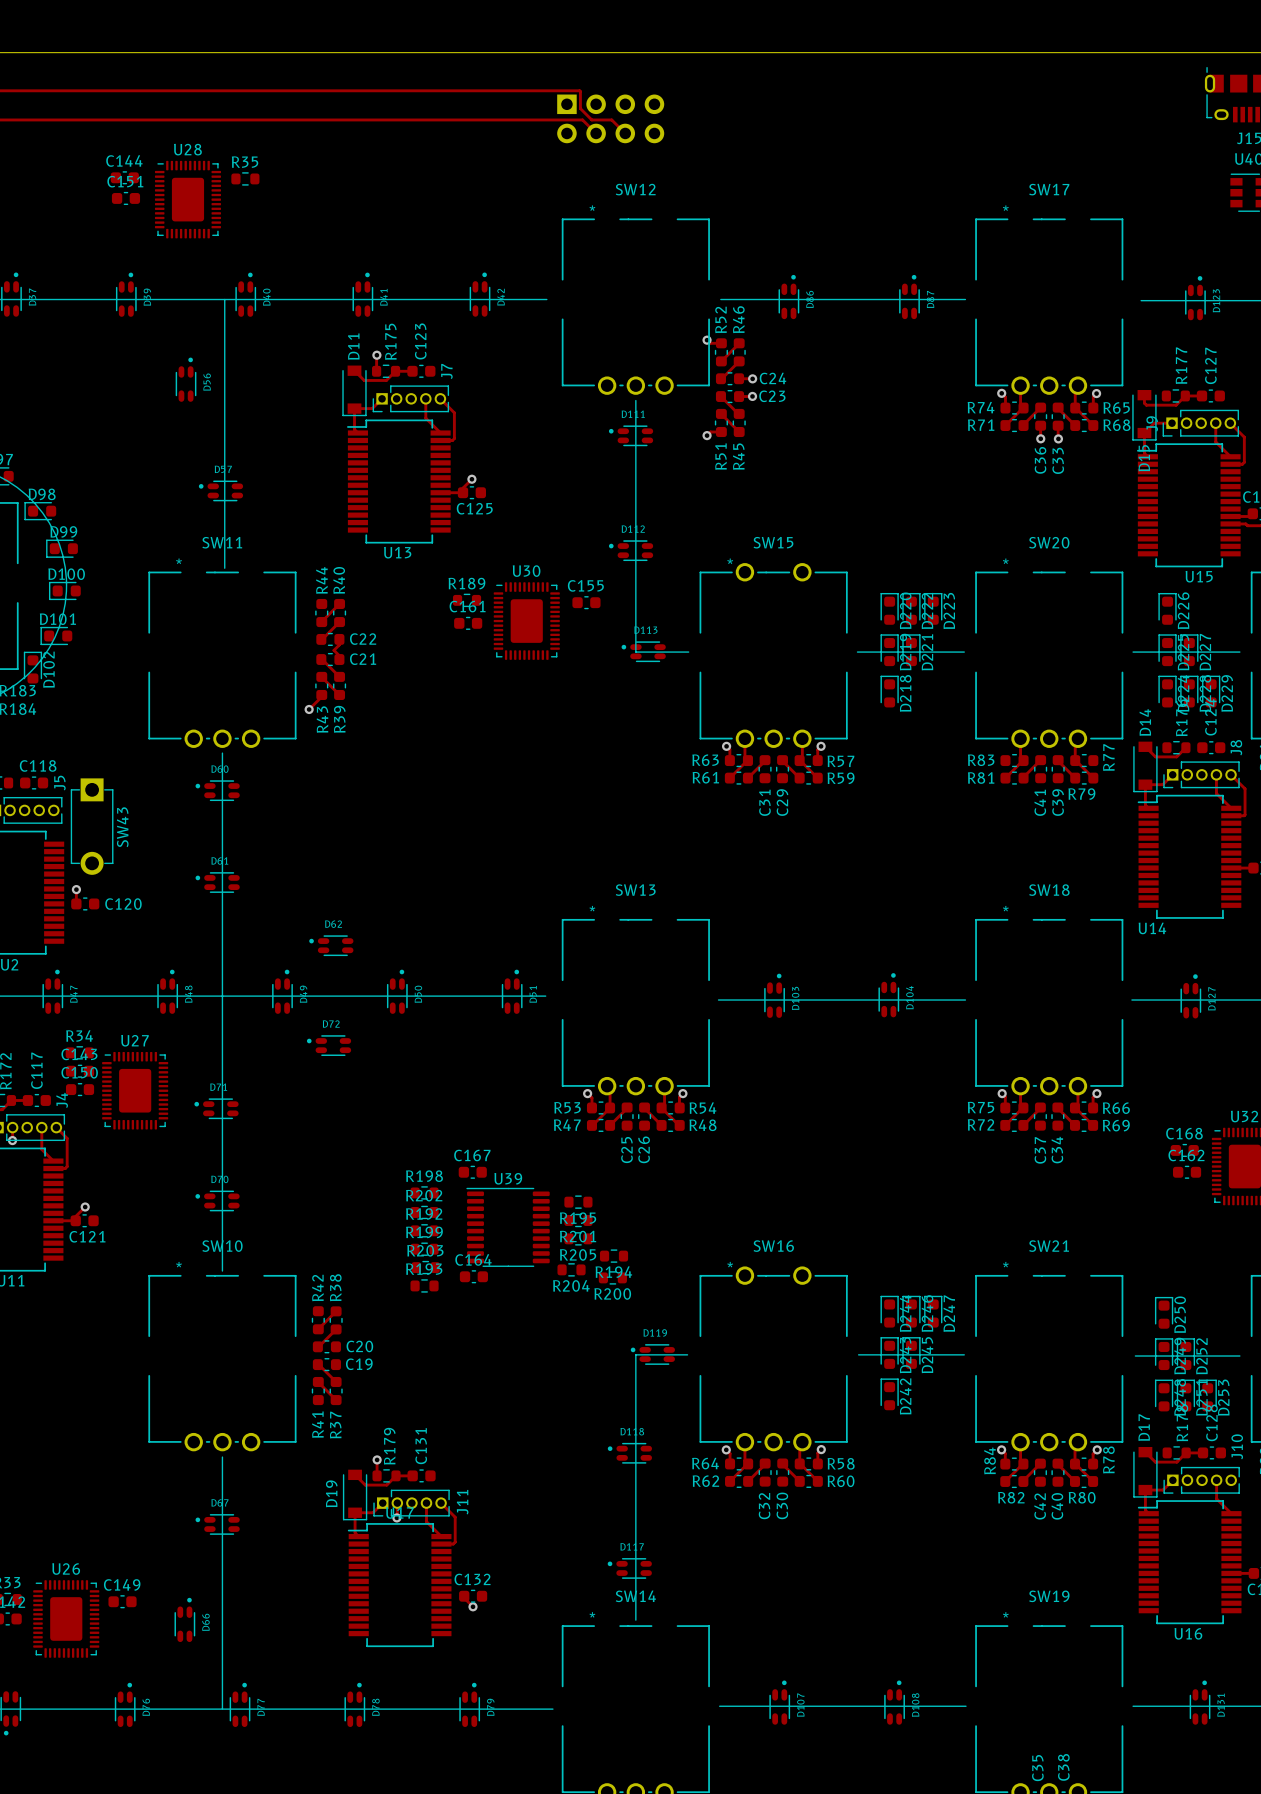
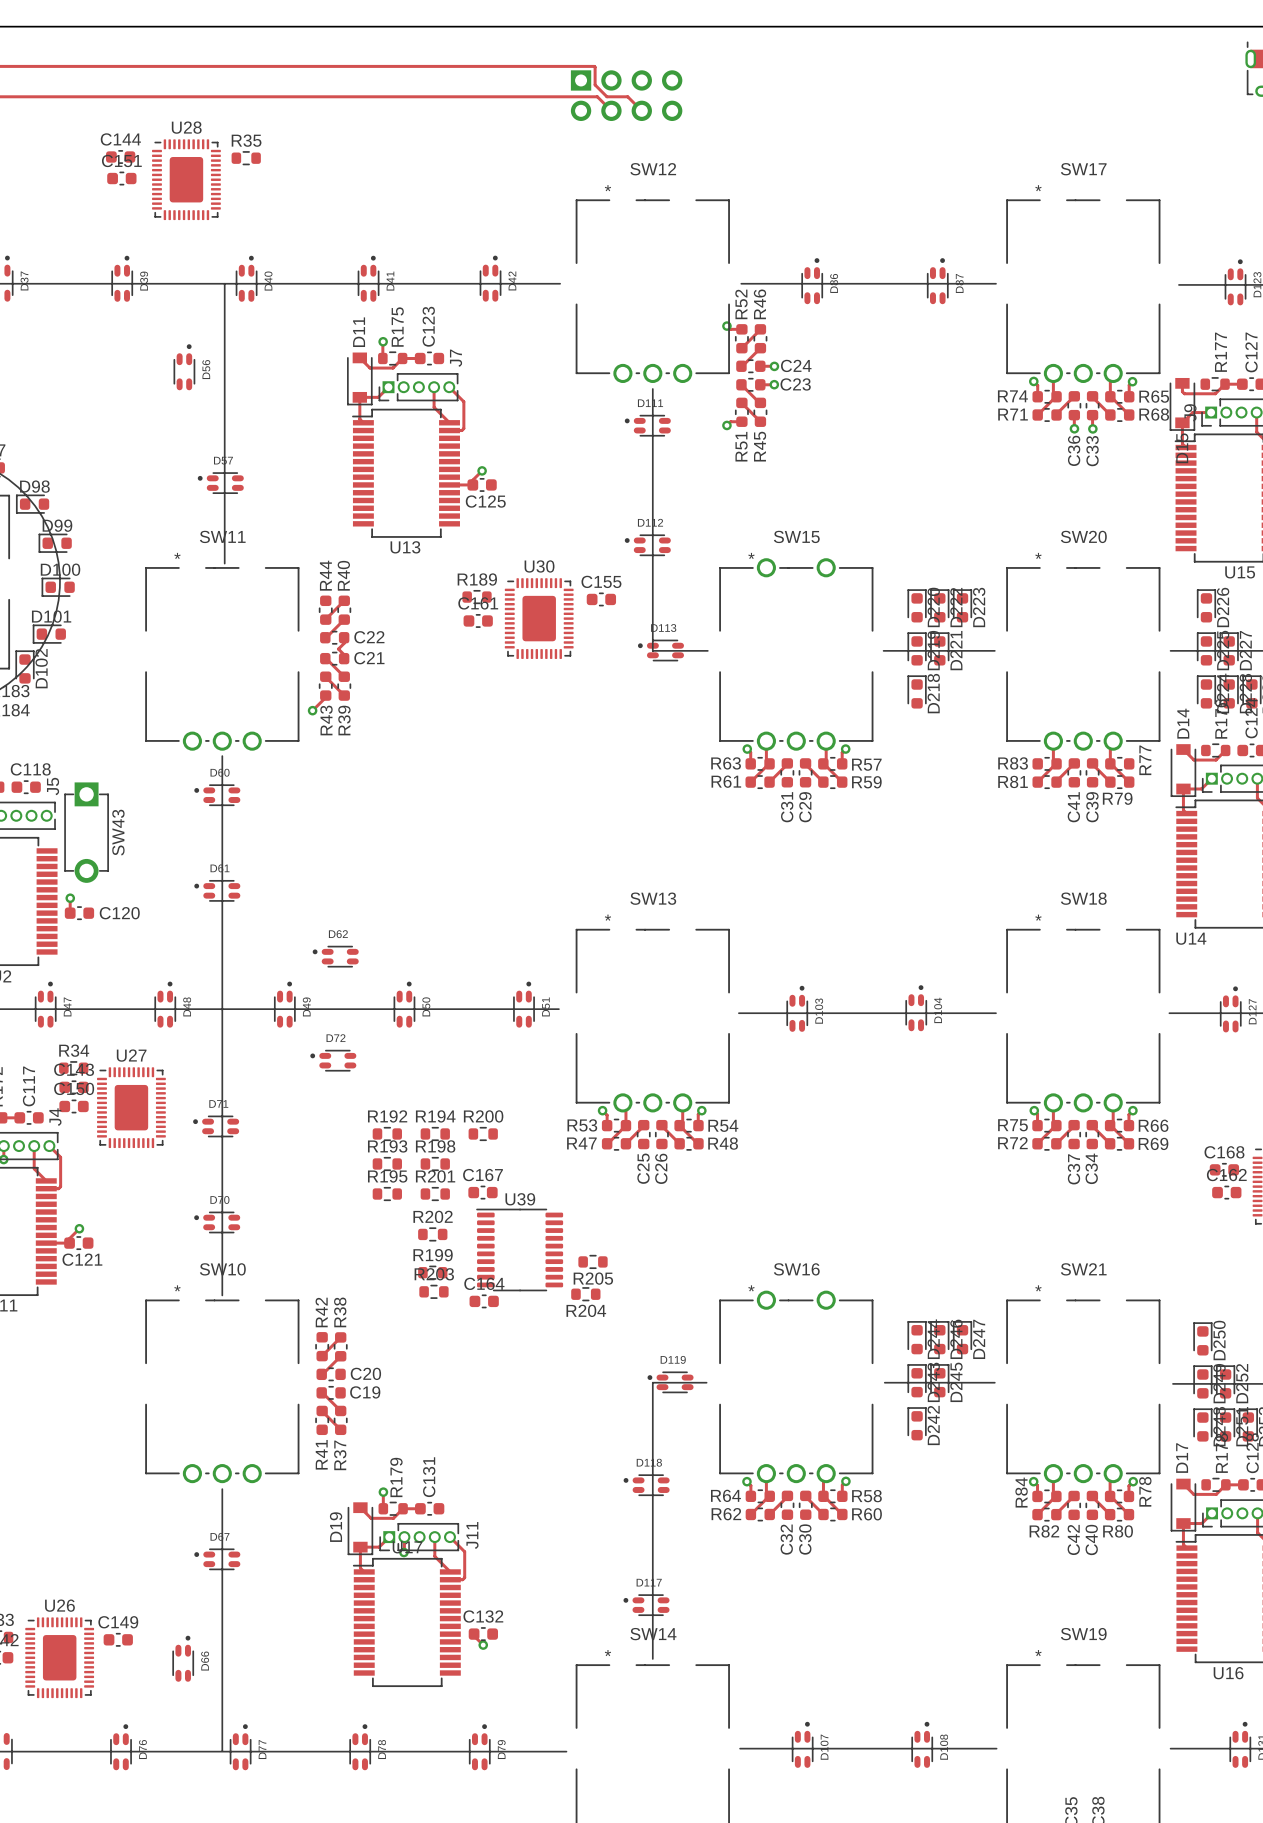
R198 position: (424, 1192) -> (435, 1164)
R195 position: (578, 1202) -> (387, 1194)
R195 name position: R195 (578, 1218) -> R195 (387, 1176)
R201 position: (578, 1220) -> (435, 1194)
R192 position: (424, 1230) -> (387, 1133)
R201 name position: R201 (578, 1236) -> R201 (435, 1176)
R194 position: (614, 1256) -> (435, 1133)
R194 name position: R194 (613, 1272) -> R194 (435, 1116)
R200 position: (612, 1277) -> (483, 1133)
R193 position: (424, 1285) -> (387, 1164)
R200 name position: R200 (612, 1293) -> R200 (483, 1116)

